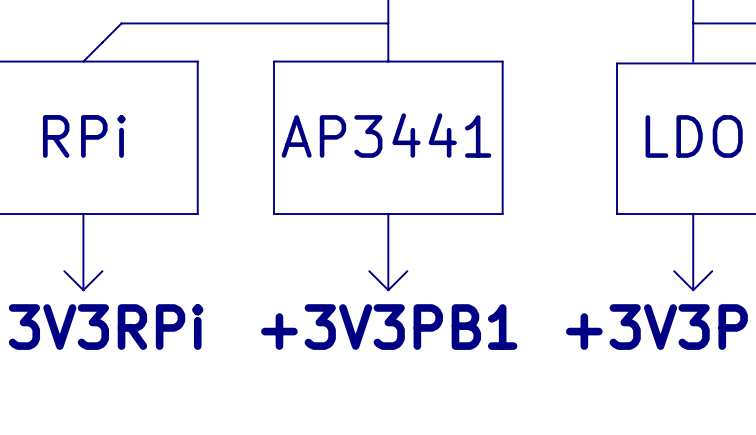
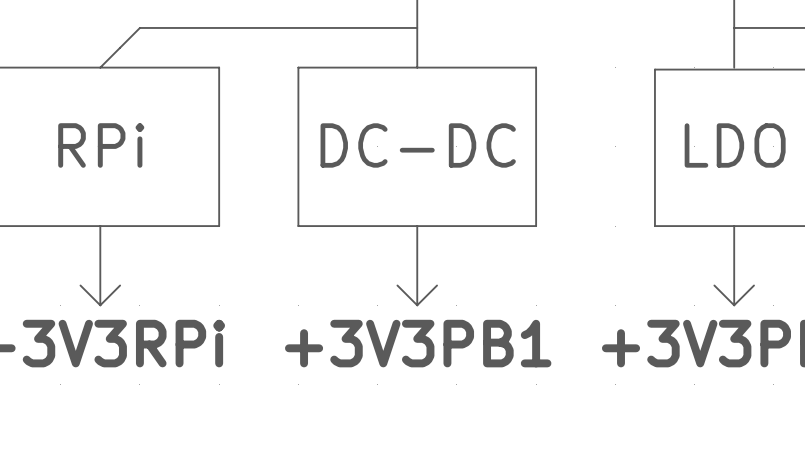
text: AP3441 (386, 135) -> DC-DC (418, 145)

